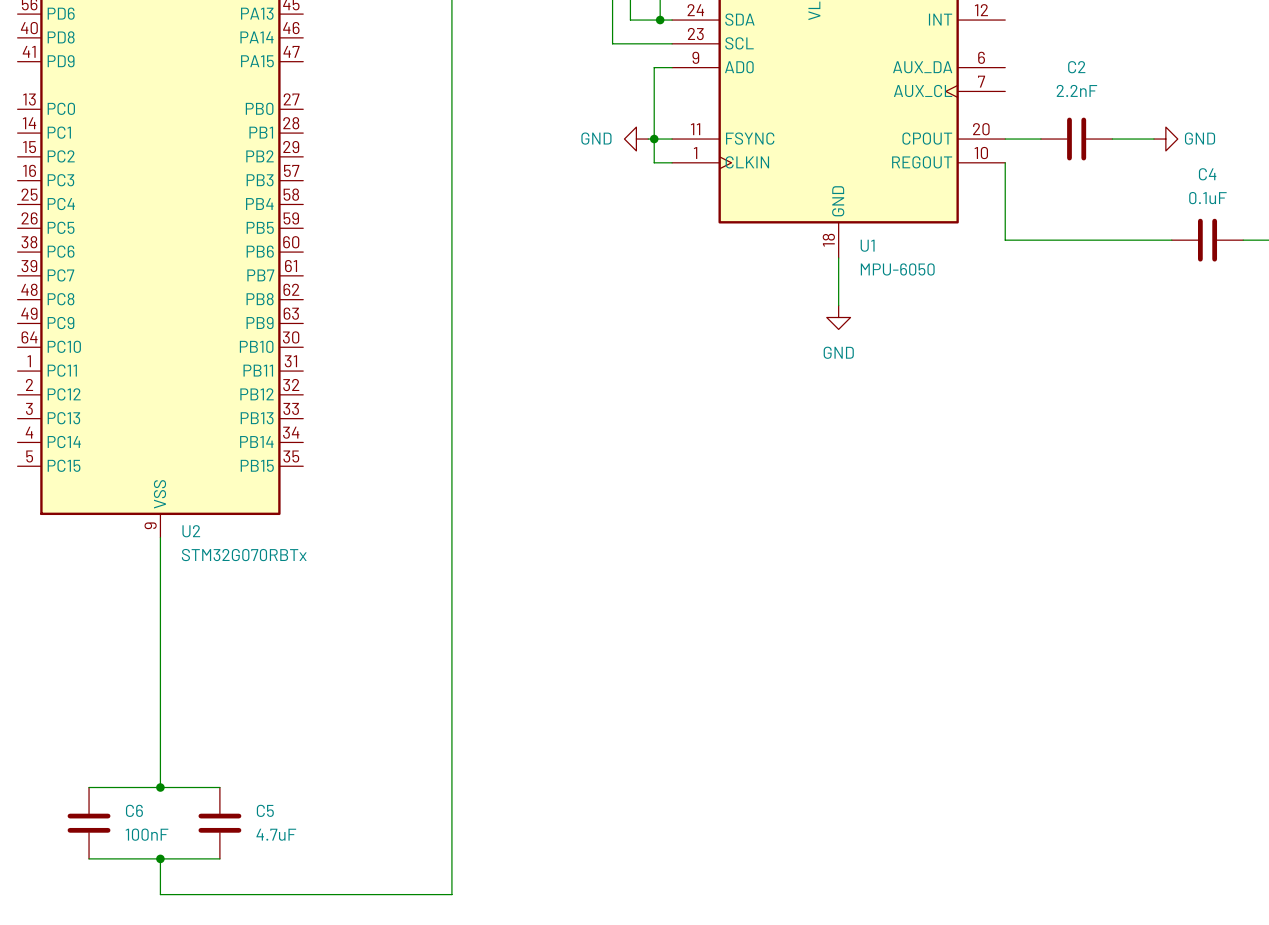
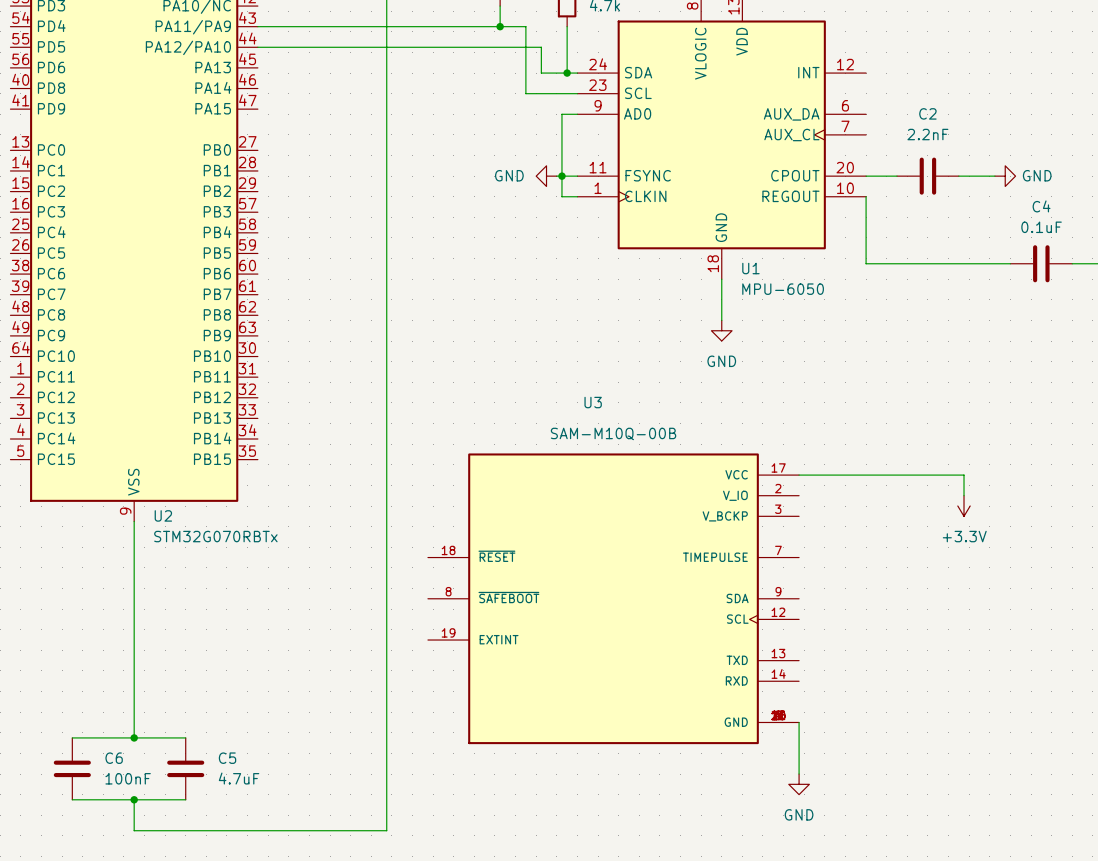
wire: none -> (799, 475) (964, 475) (964, 495)
power symbol: none -> +3.3V (964, 506)
U3: none -> SAM-M10Q-00B (613, 598)
wire: none -> (799, 722) (799, 774)
power symbol: none -> GND (799, 784)

